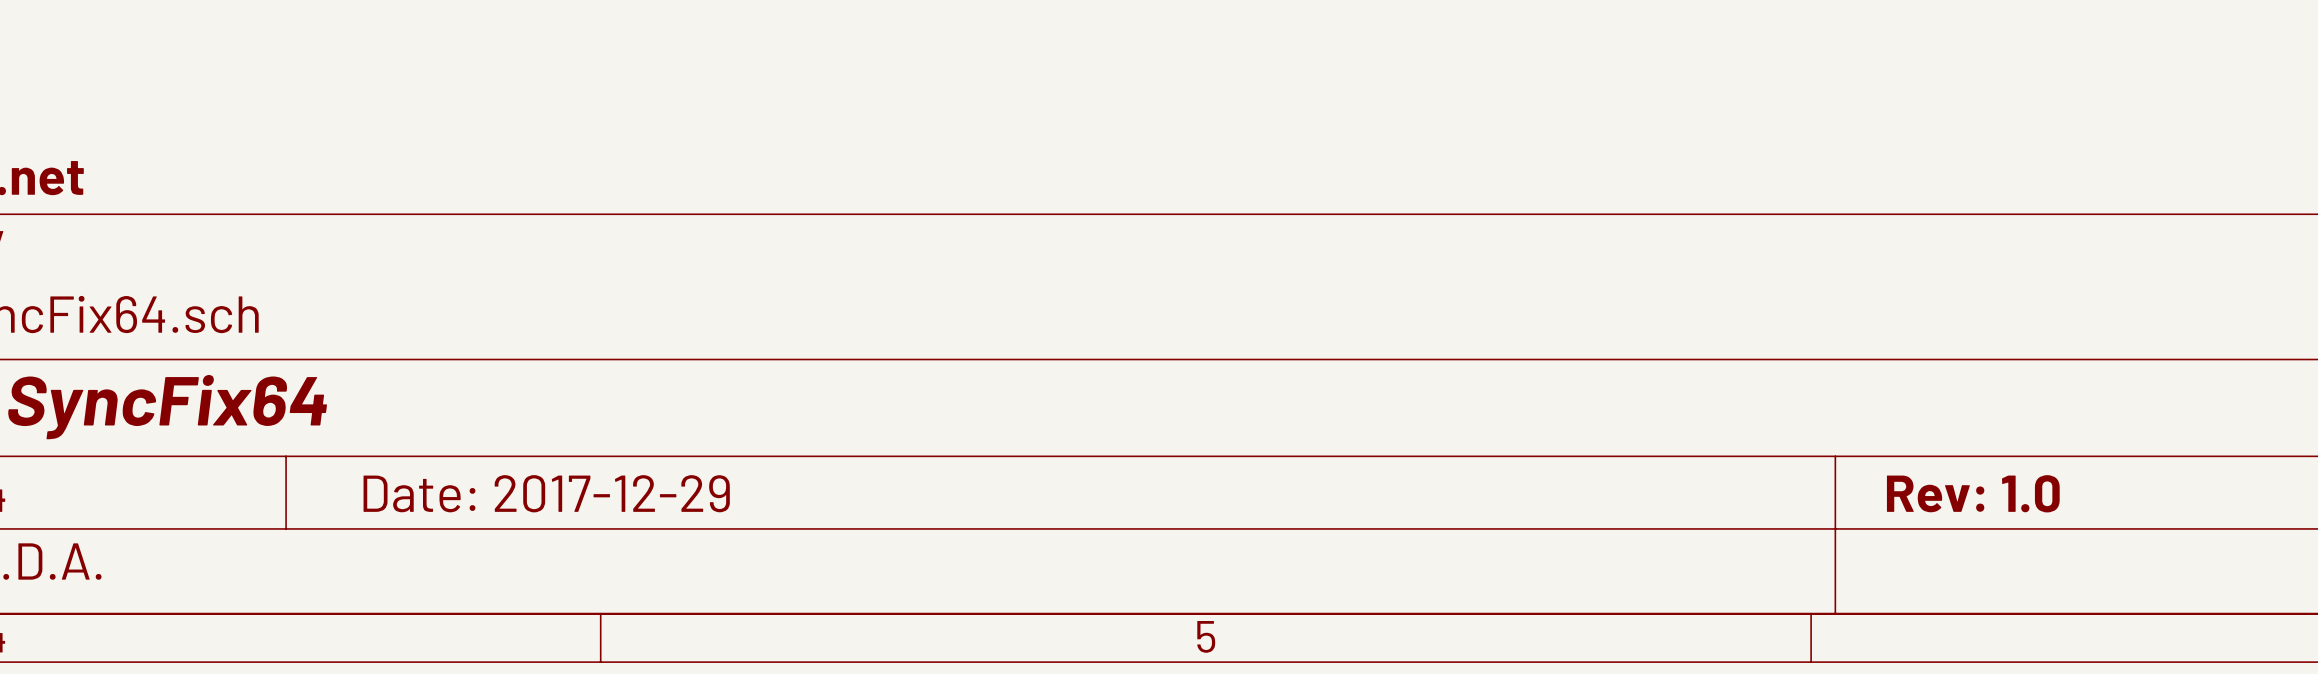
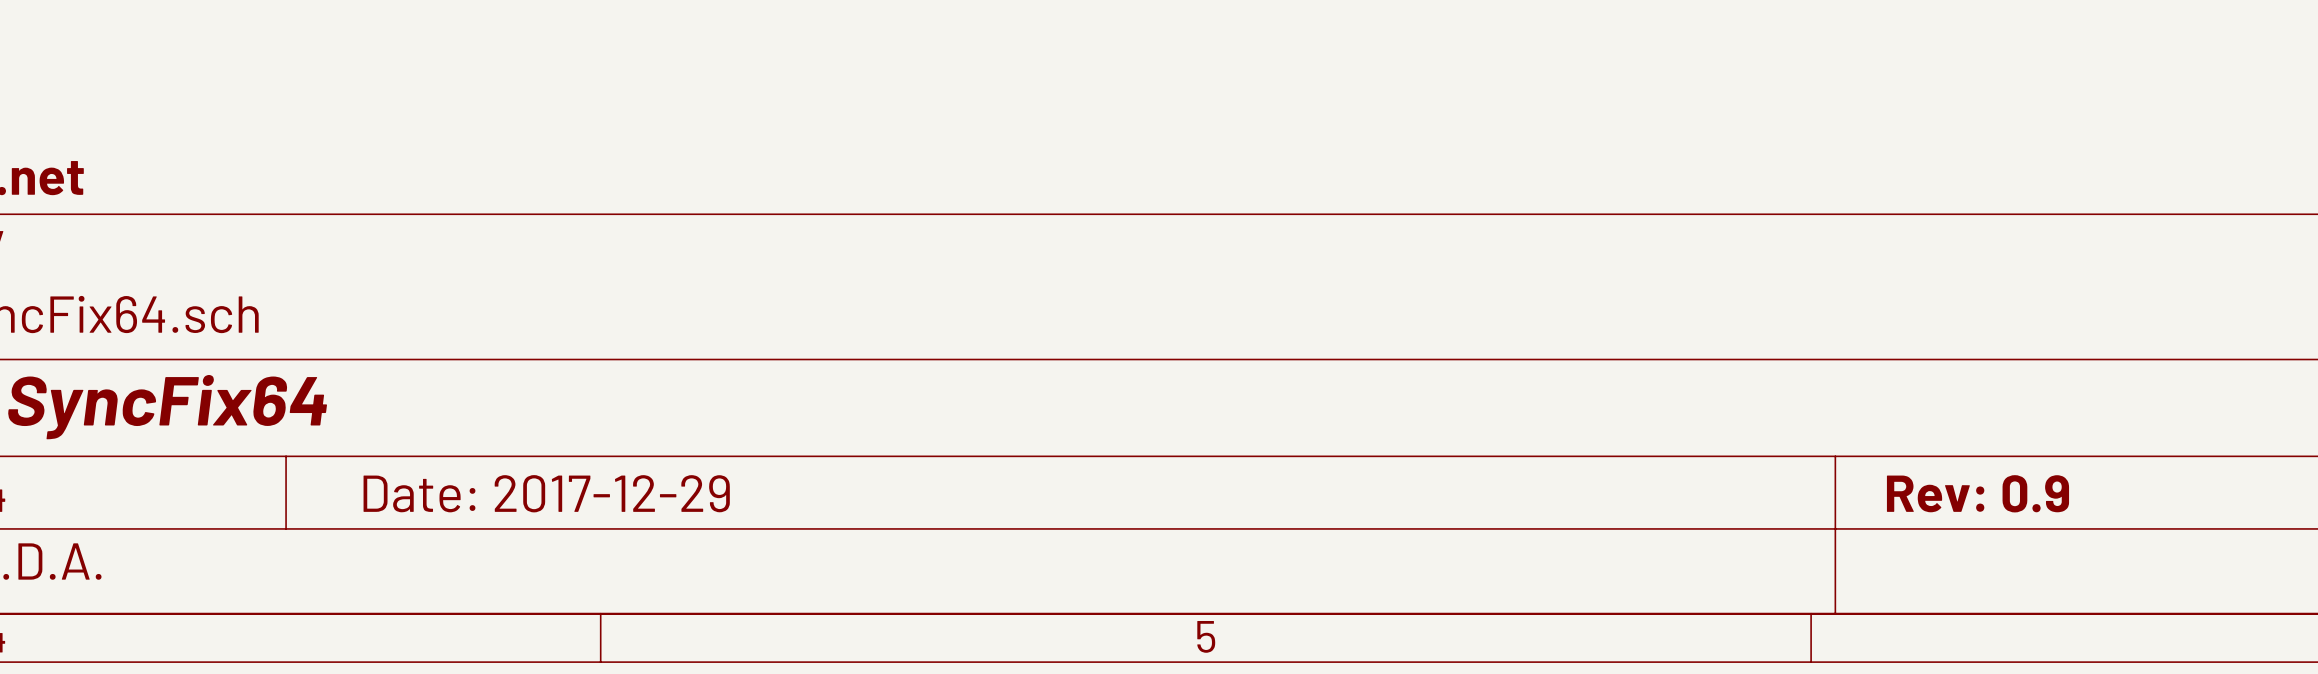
title block: Rev: 1.0 (1973, 493) -> Rev: 0.9 (1977, 493)

